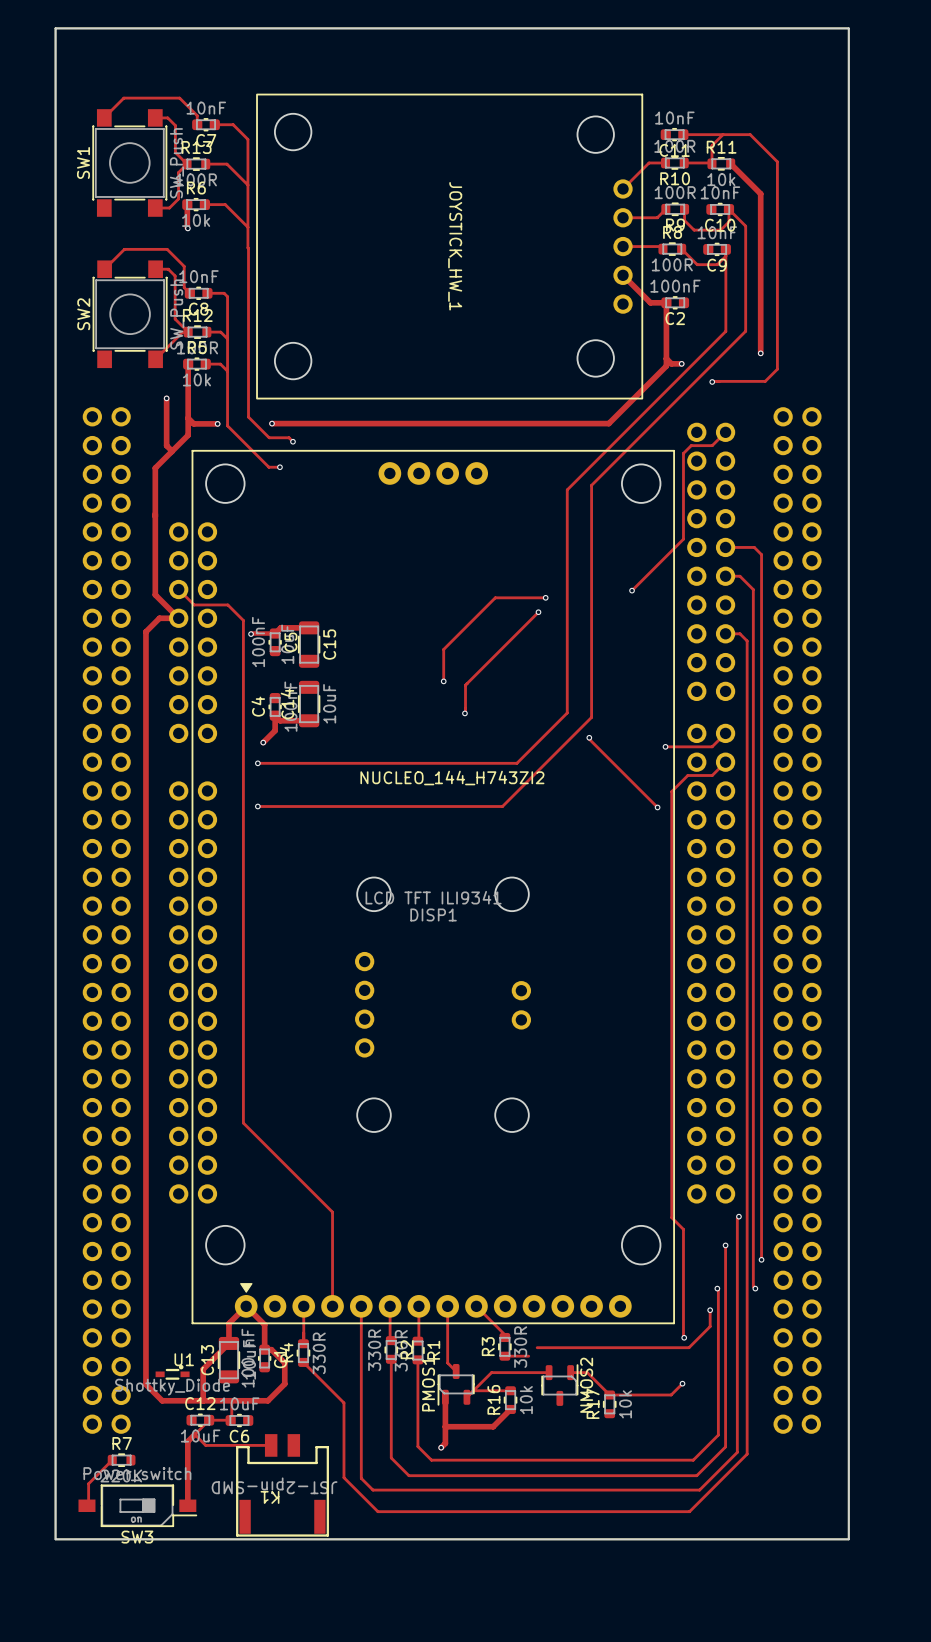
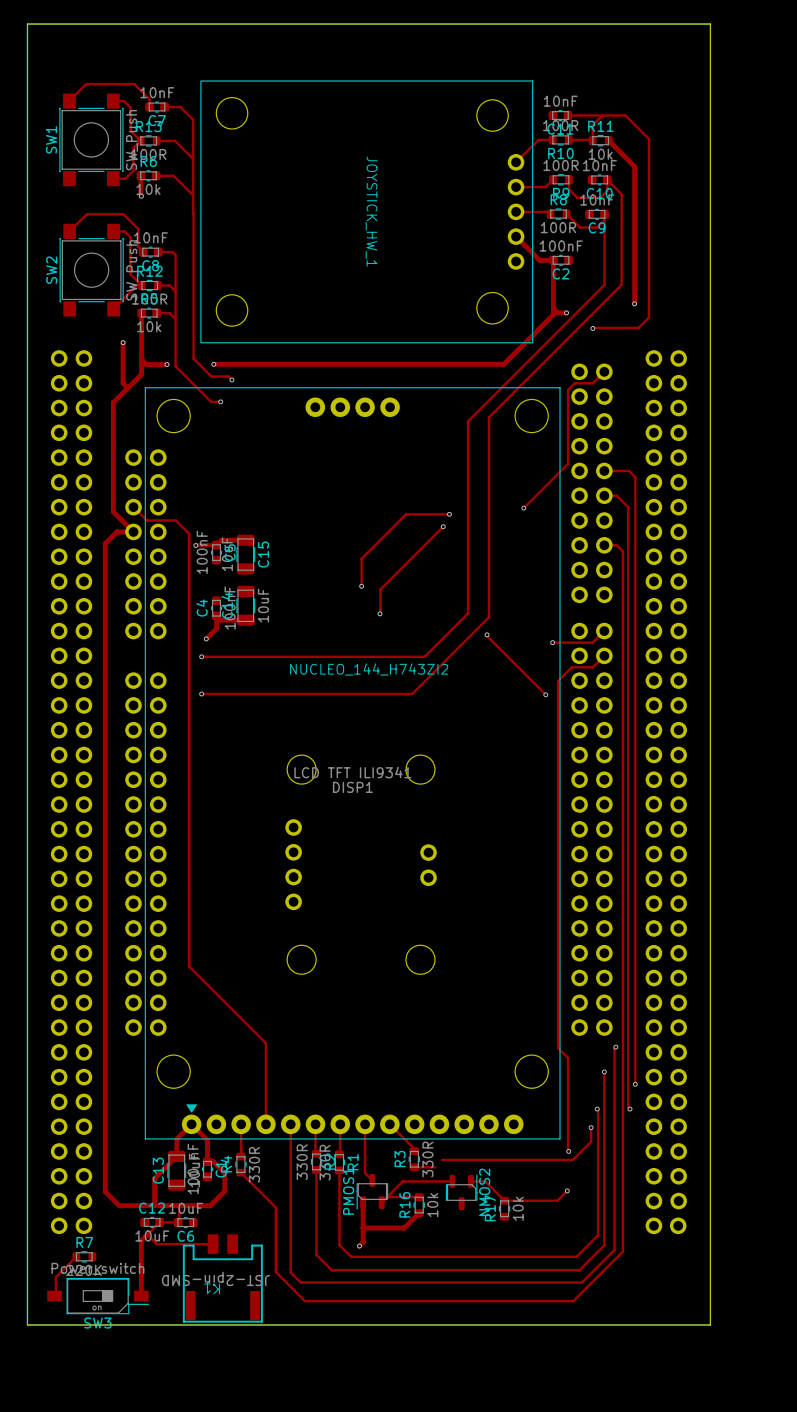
U1: Shottky_Diode (172, 1372) -> none

